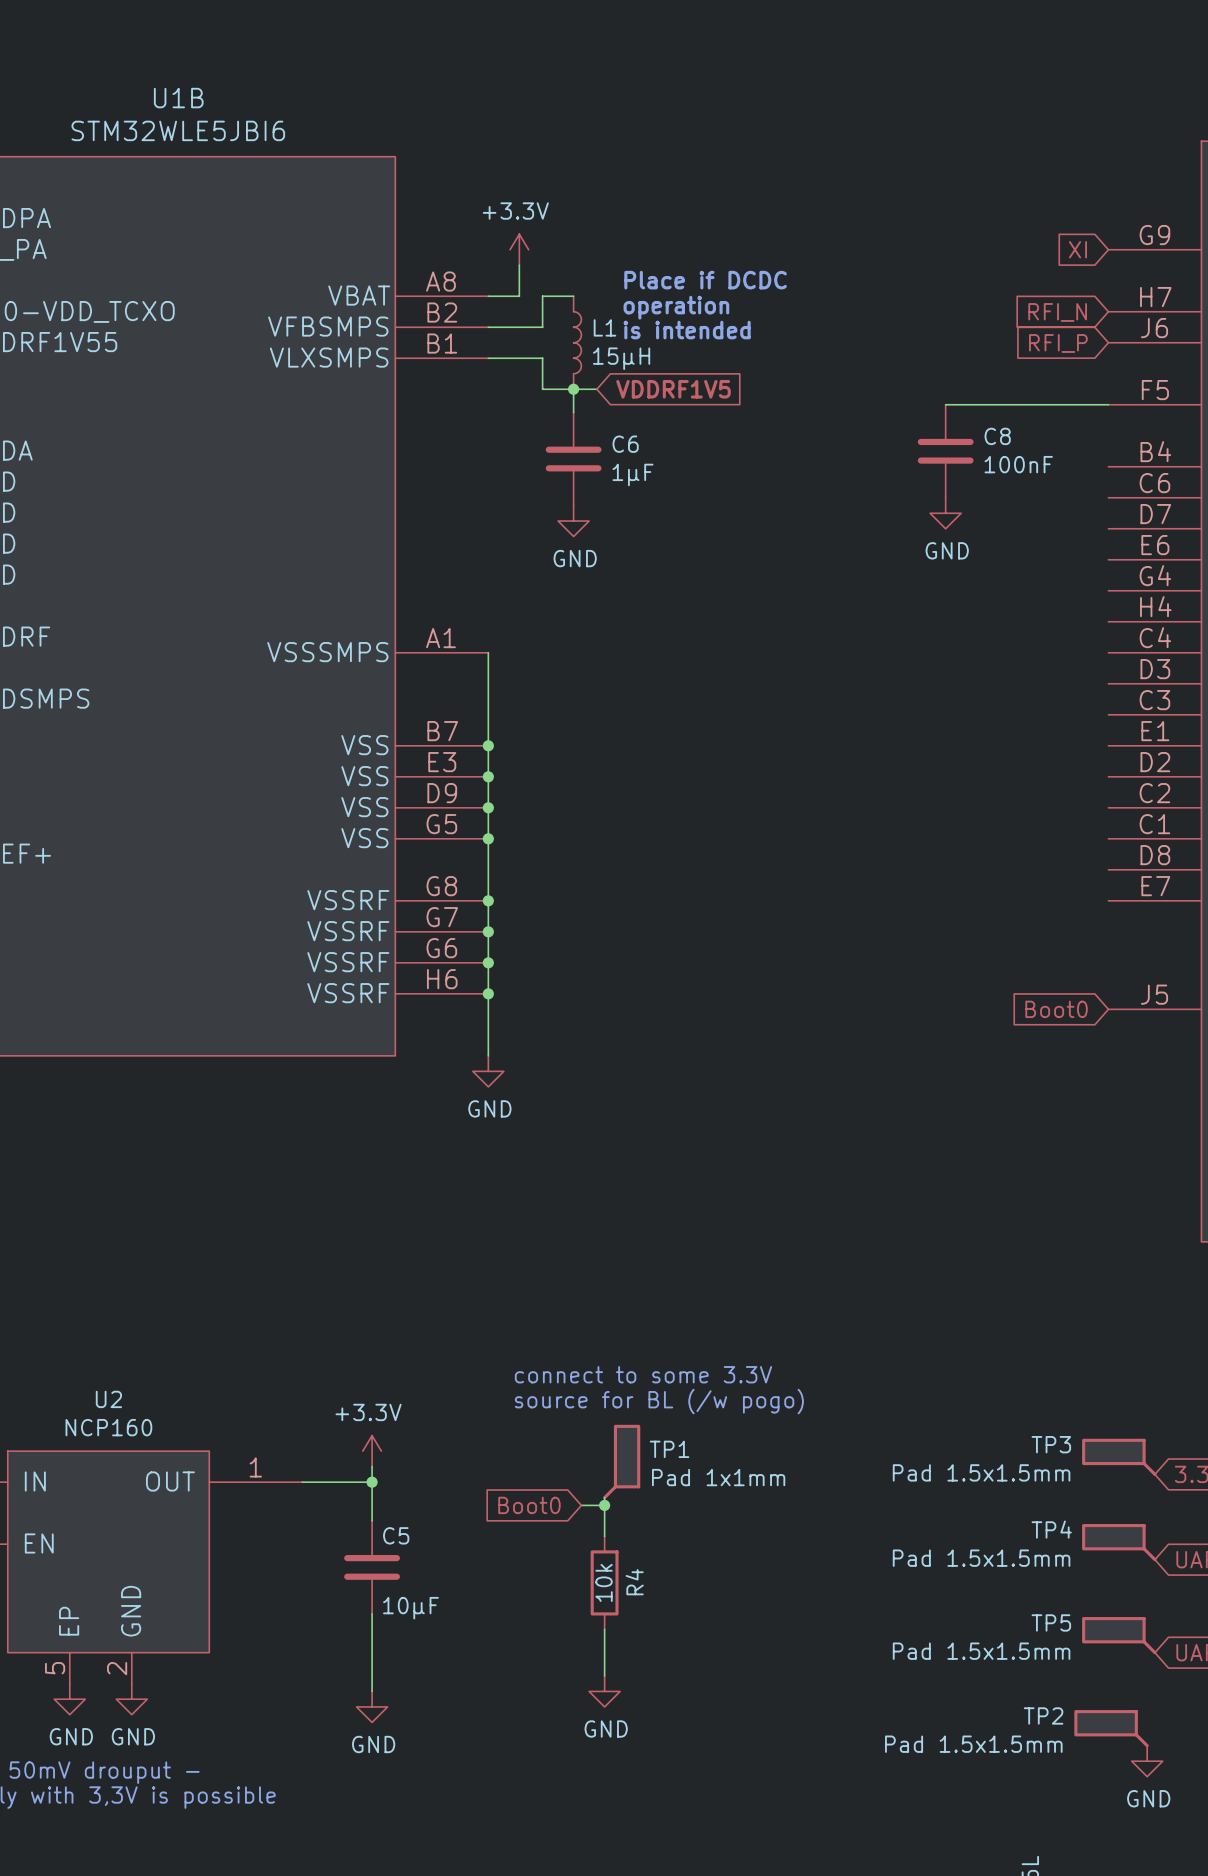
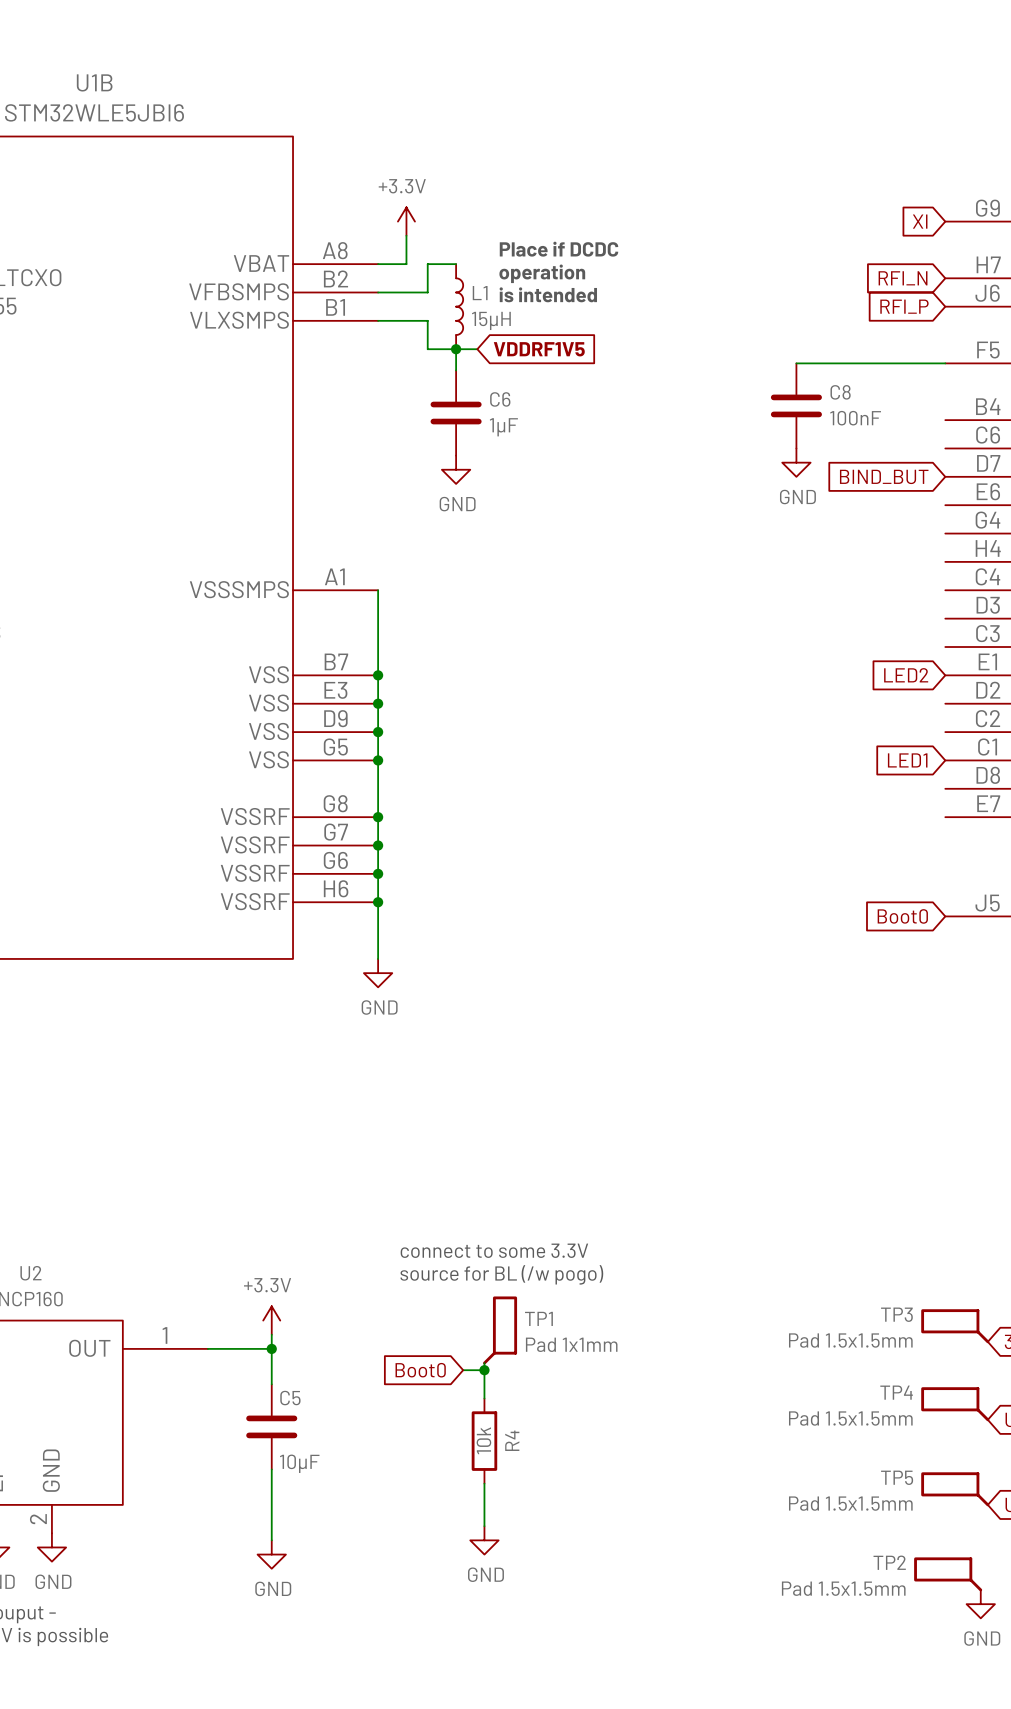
global label: none -> BIND_BUT (884, 476)
global label: none -> LED2 (906, 675)
global label: none -> LED1 (907, 760)

